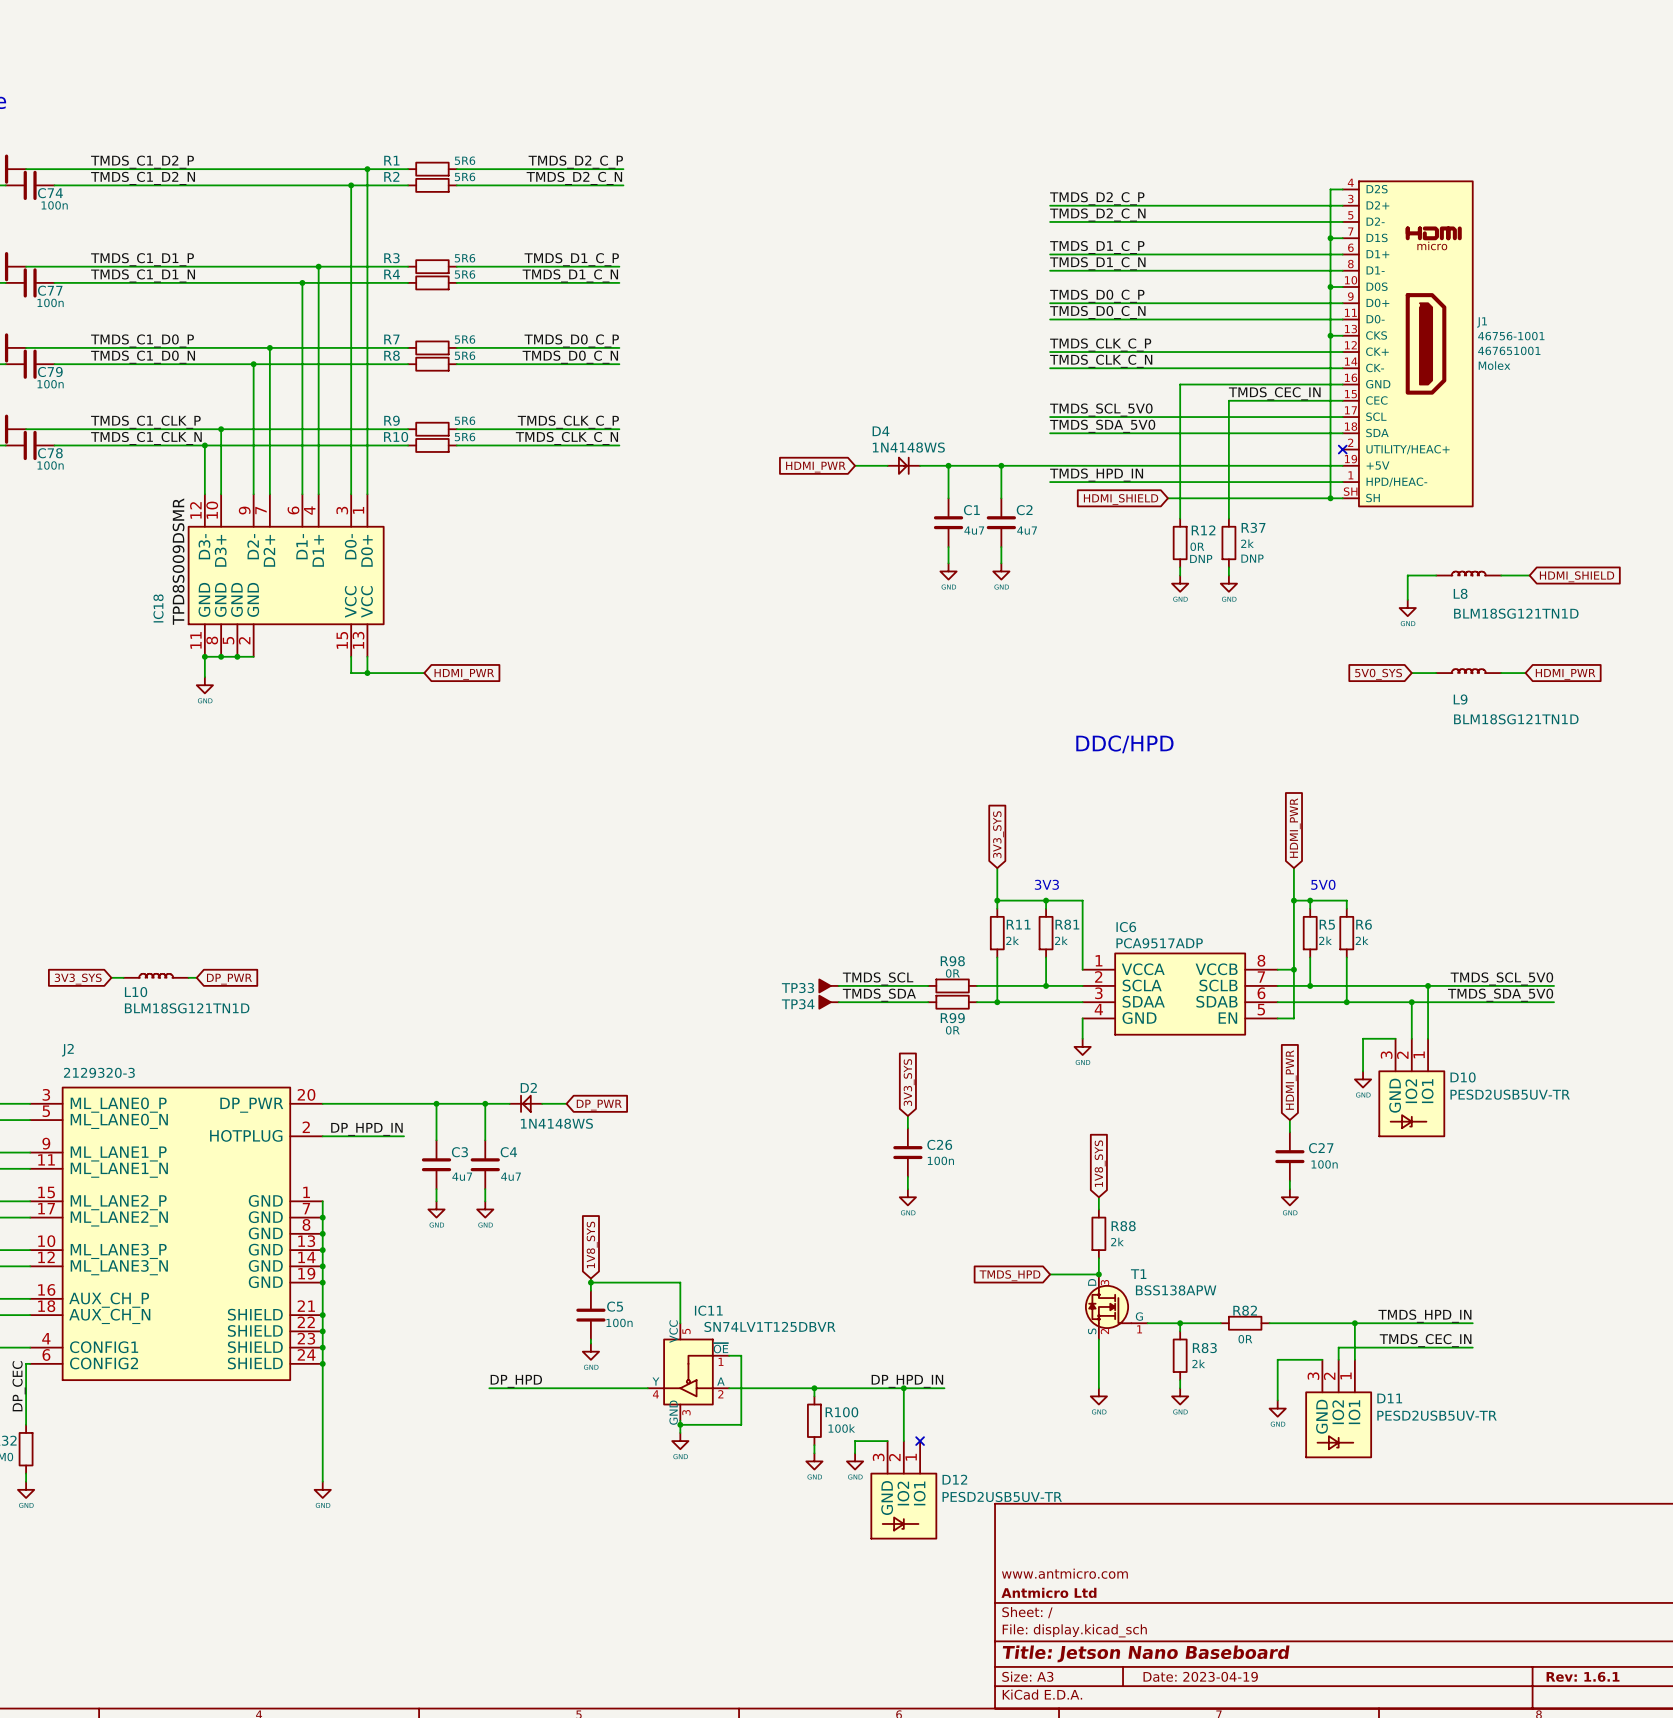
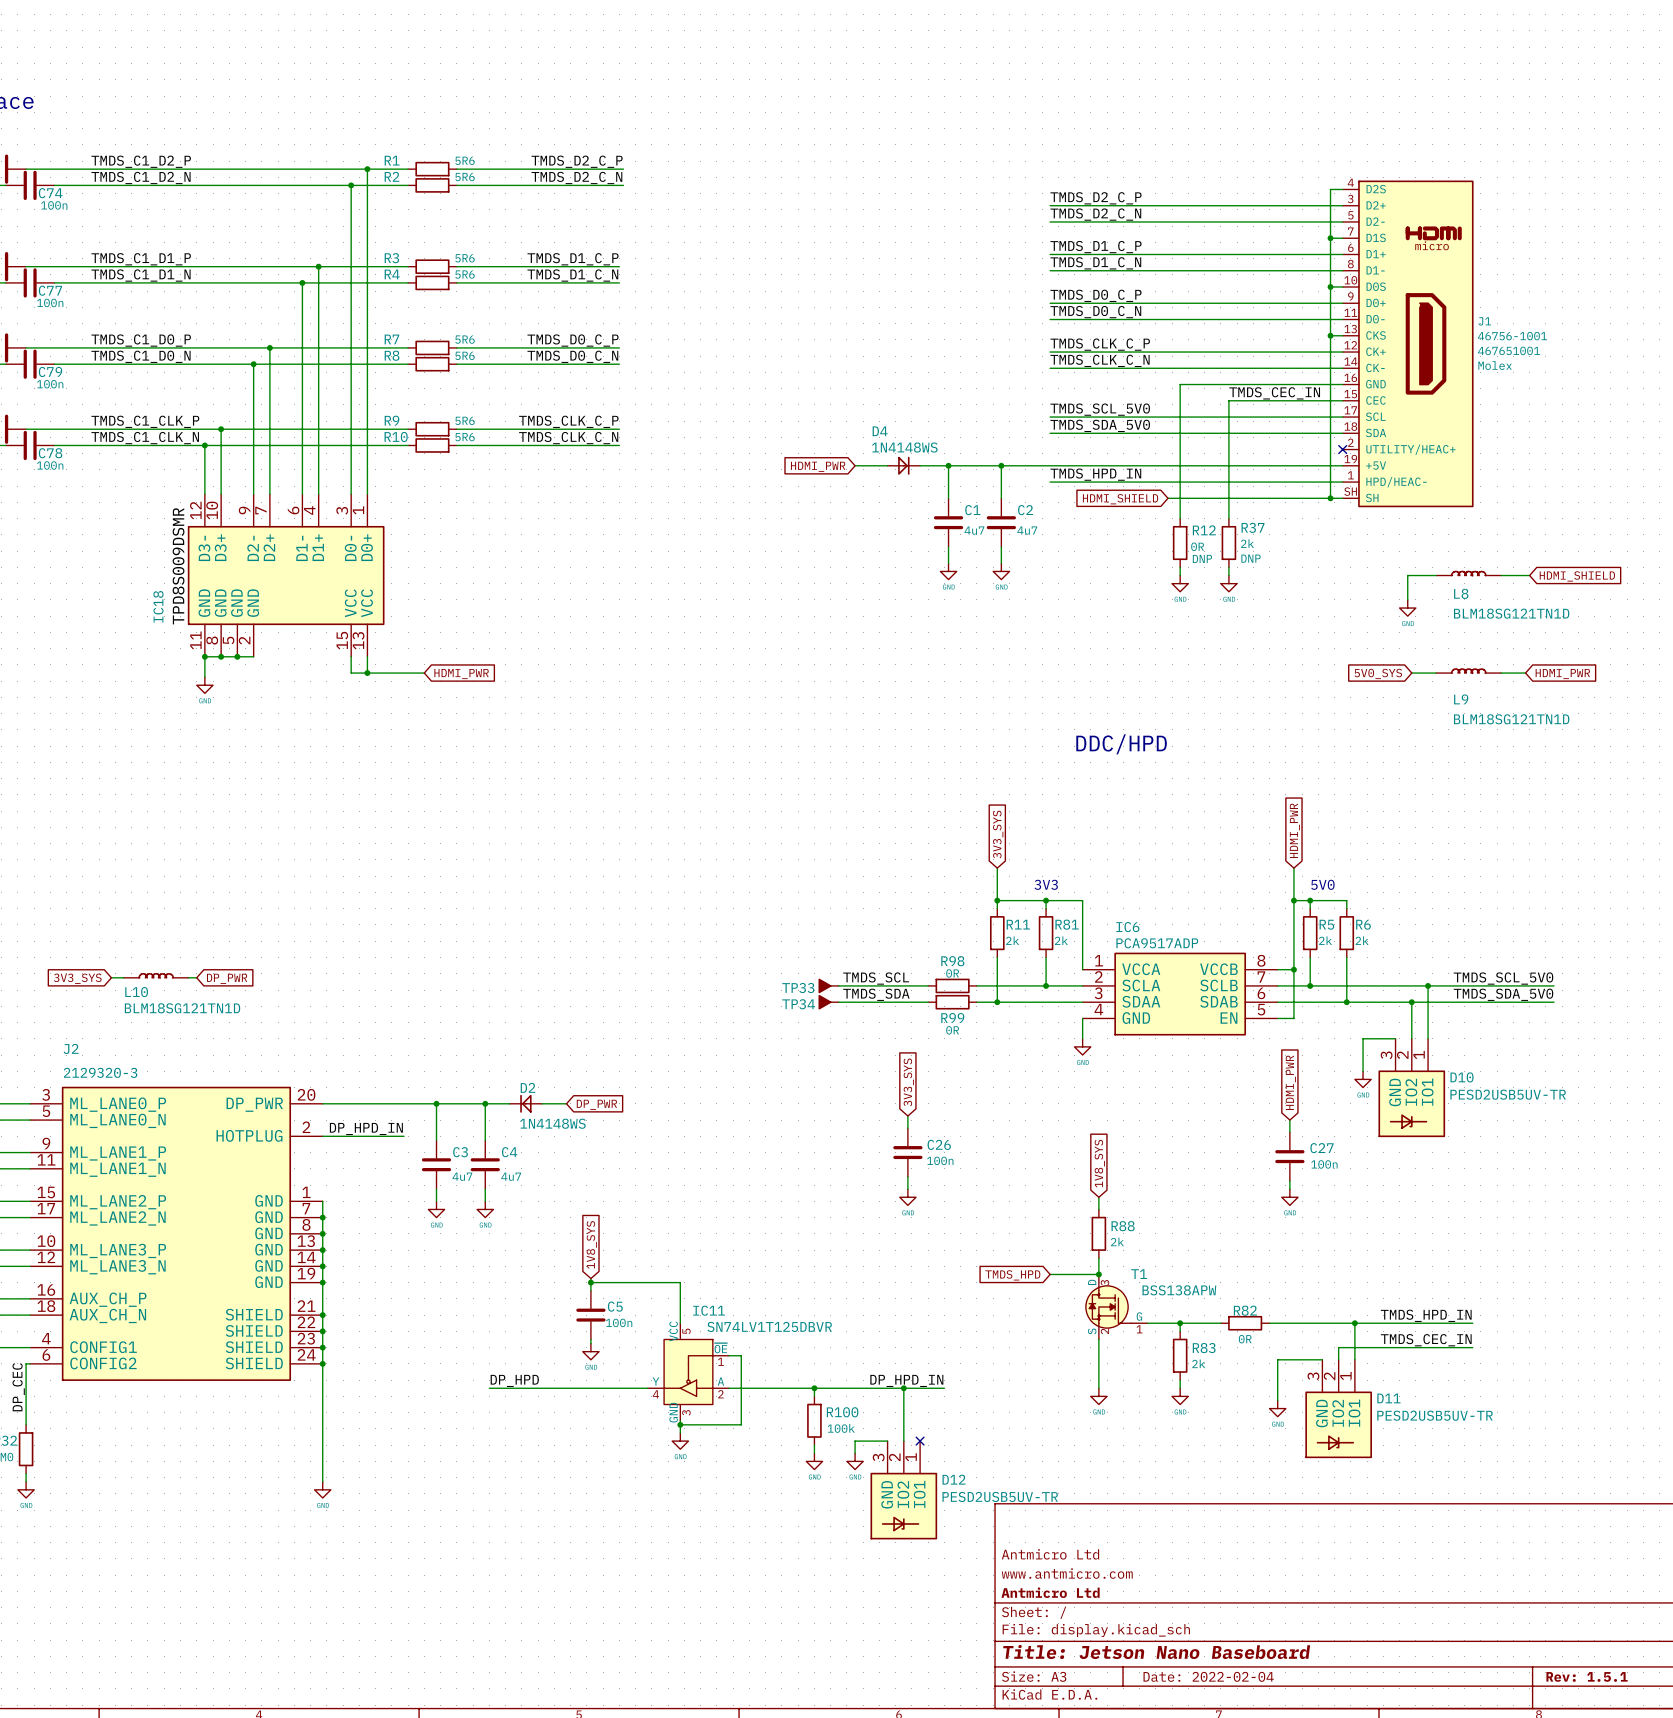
title block: none -> Antmicro Ltd (1050, 1554)
title block: Date: 2023-04-19 (1200, 1676) -> Date: 2022-02-04 (1208, 1676)
title block: Rev: 1.6.1 (1583, 1676) -> Rev: 1.5.1 (1587, 1676)

